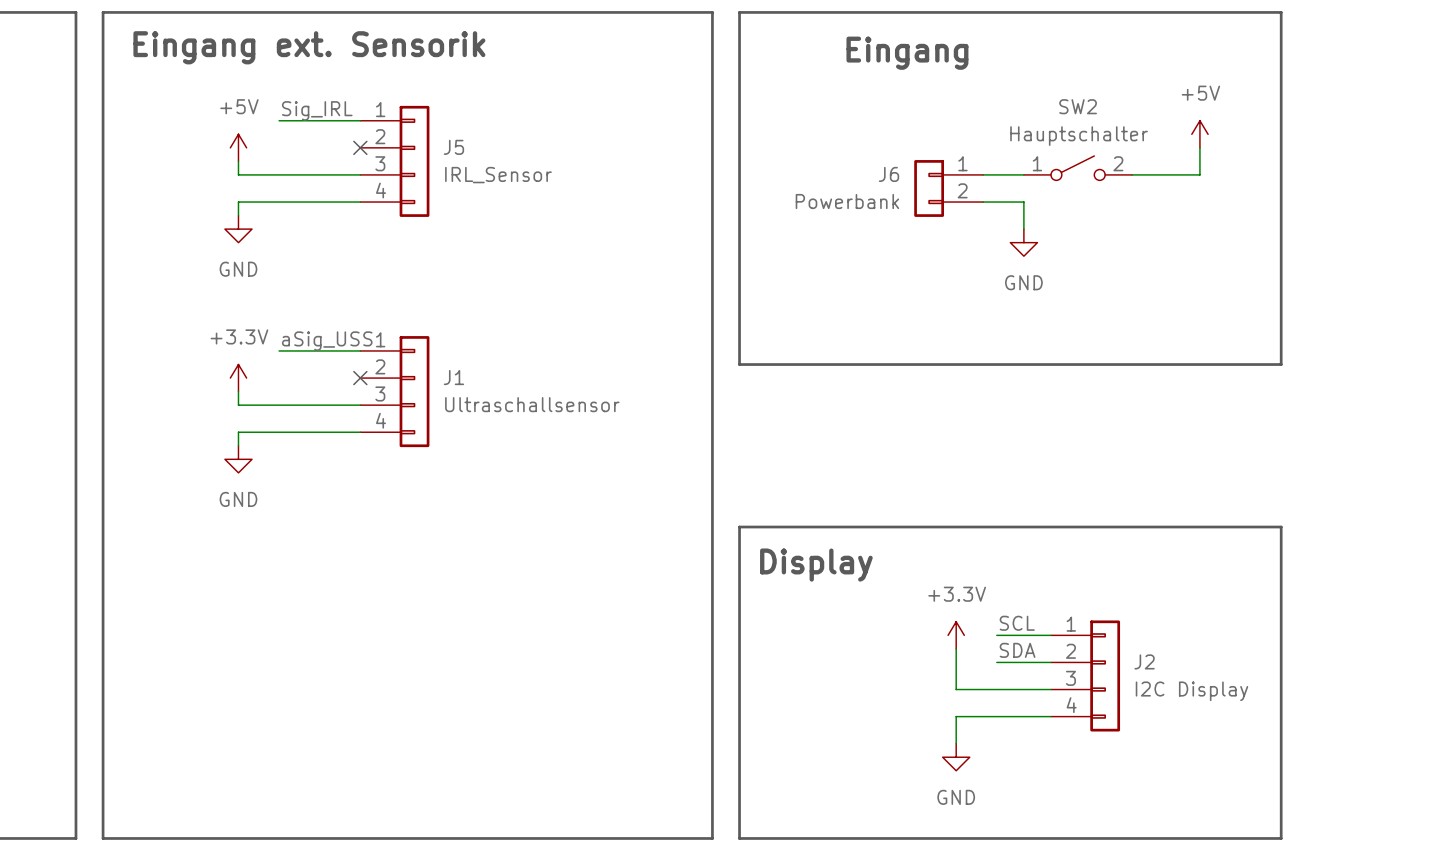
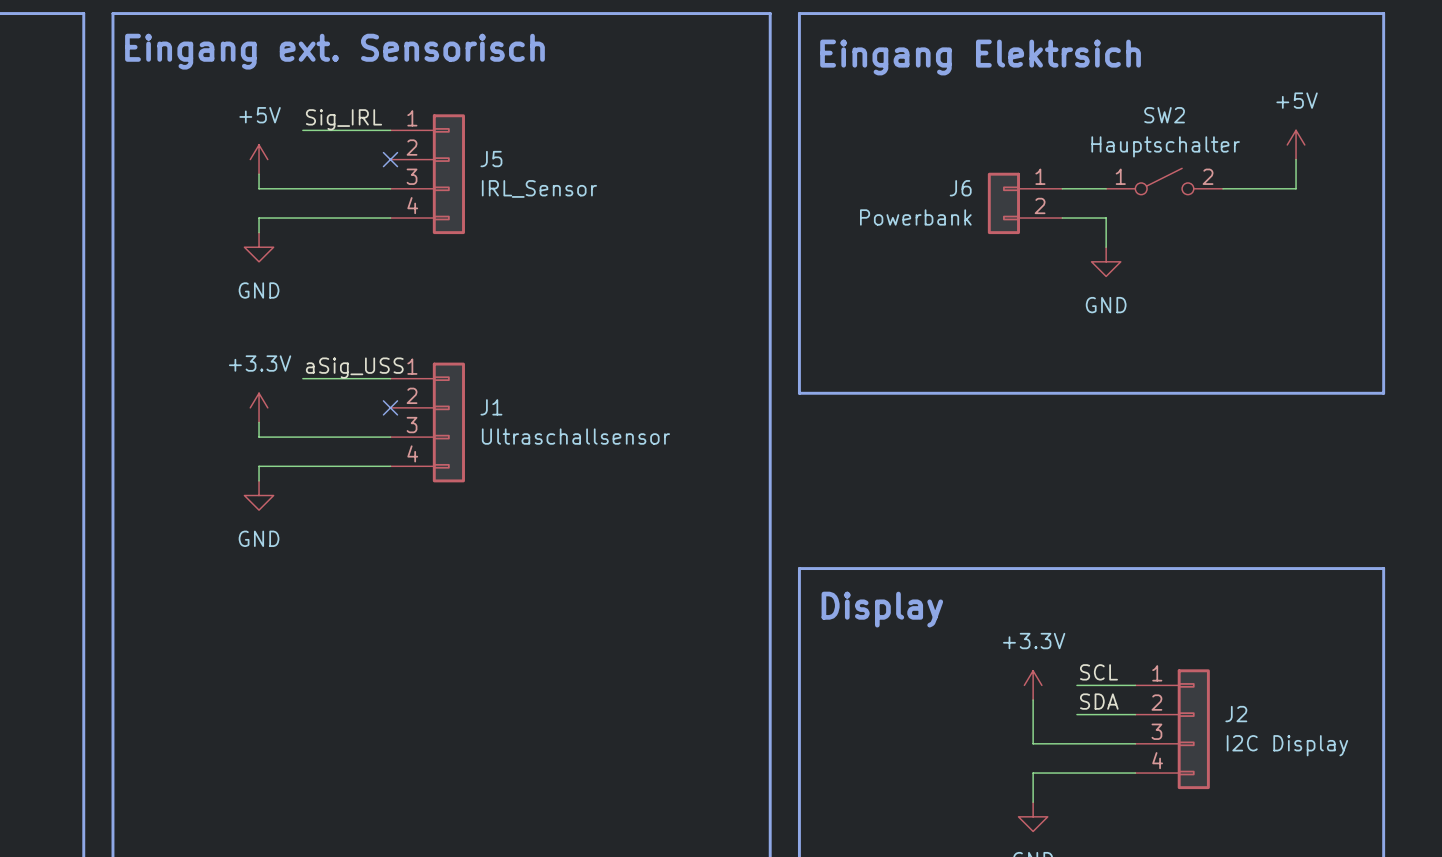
text: Eingang ext. Sensorik (309, 47) -> Eingang ext. Sensorisch (334, 51)
text: Eingang (907, 53) -> Eingang Elektrsich (980, 57)

